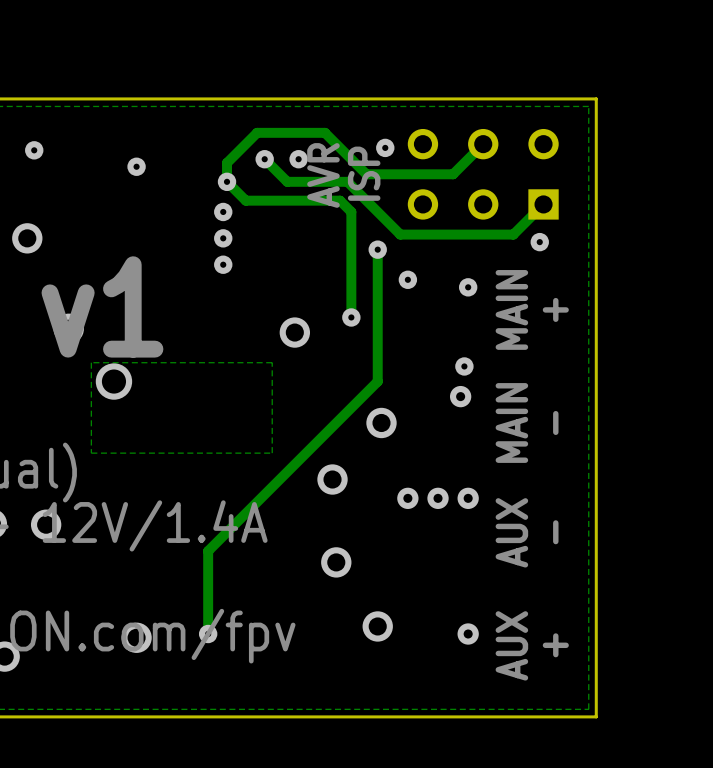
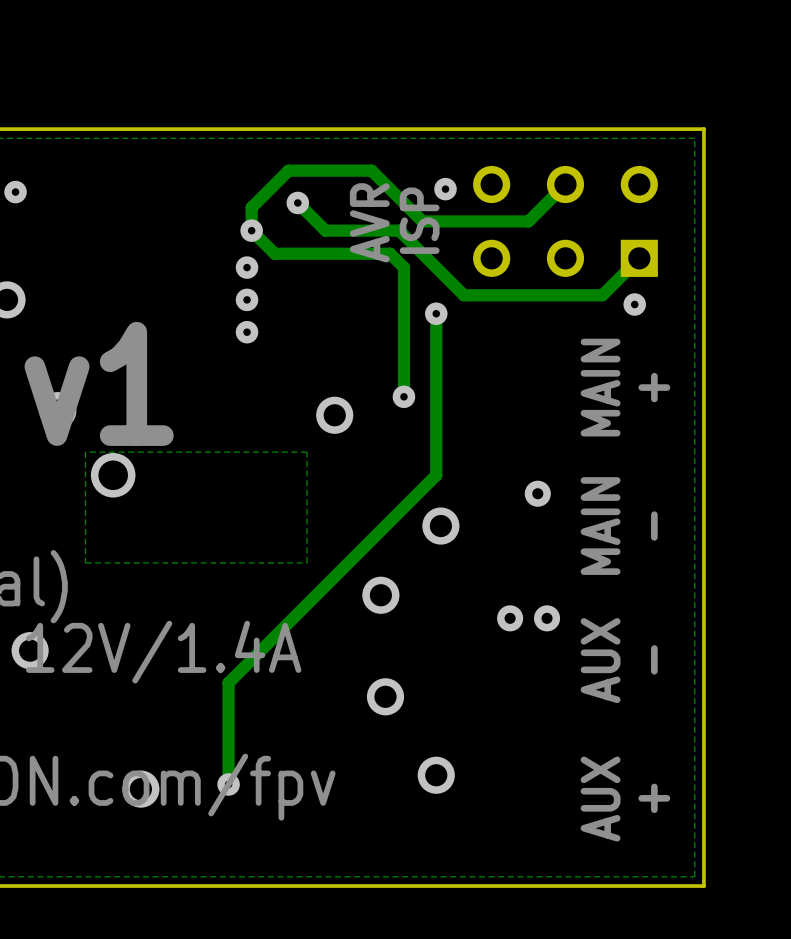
via: (298, 159) -> none
via: (136, 166) -> none
via: (407, 279) -> none
via: (468, 287) -> none
via: (464, 366) -> none
via: (407, 498) -> none
via: (468, 634) -> none

